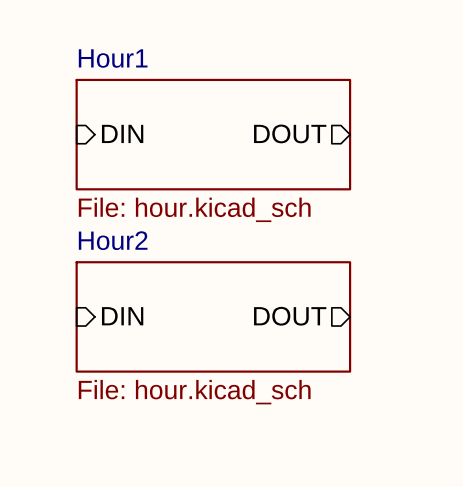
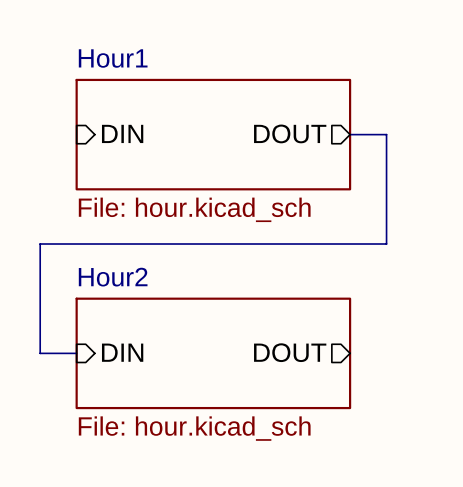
wire: none -> (350, 134) (386, 134) (386, 244) (40, 244) (40, 353) (76, 353)
sheet pin position: DIN (122, 316) -> DIN (122, 352)
sheet Hour2 position: (213, 316) -> (213, 353)
sheet pin position: DOUT (290, 316) -> DOUT (290, 352)

